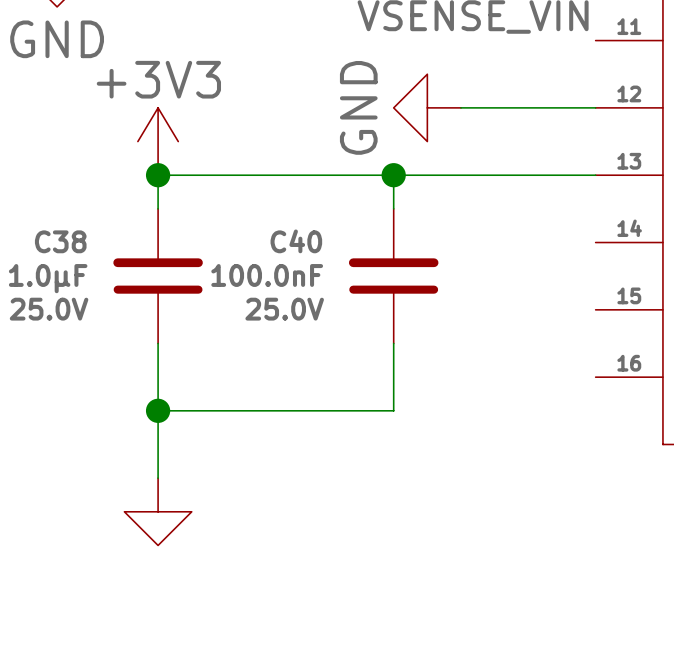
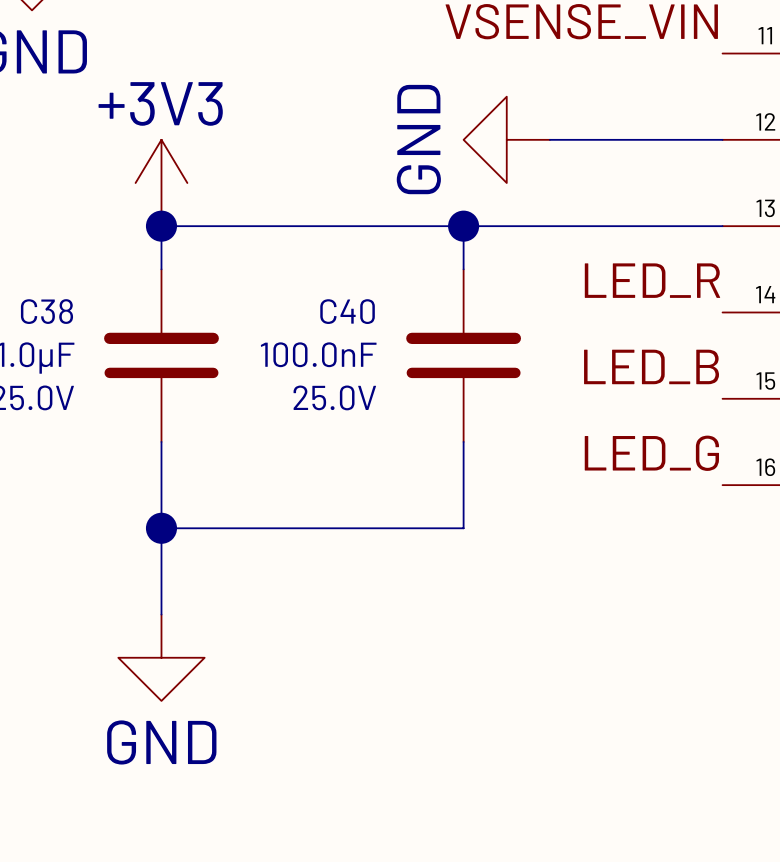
label: none -> LED_R (652, 280)
label: none -> LED_B (651, 366)
label: none -> LED_G (651, 453)
power symbol text: none -> GND (161, 742)

